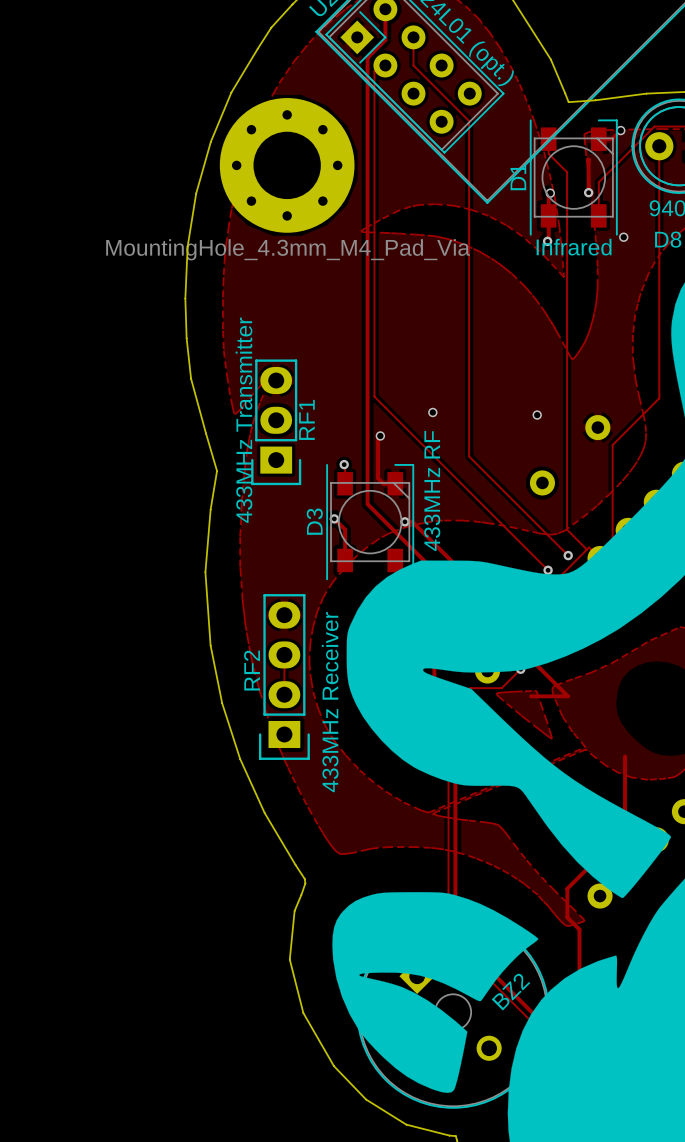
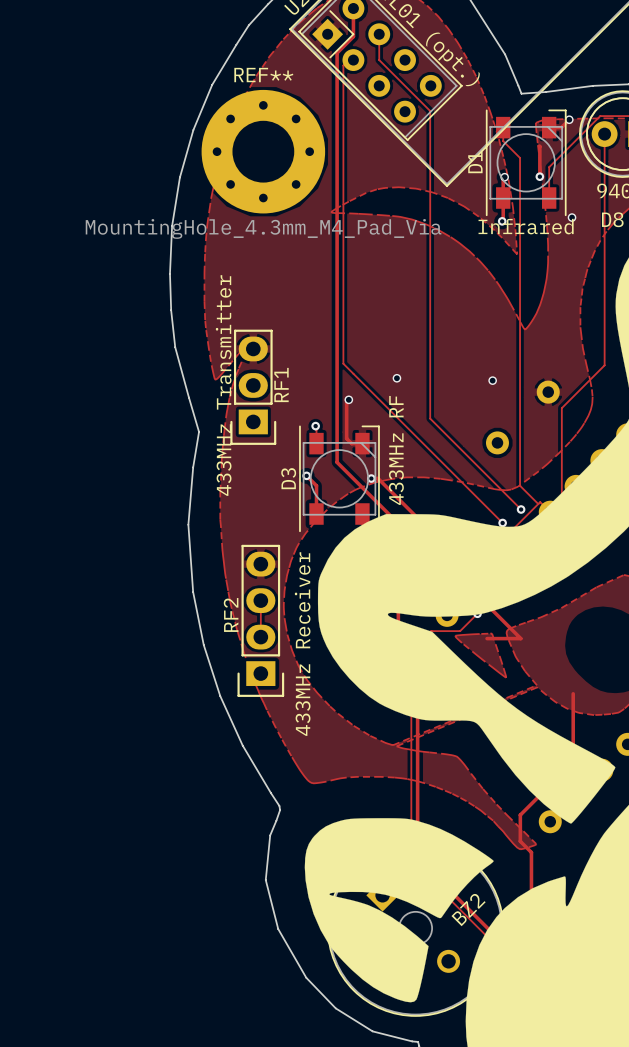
REF** name: none -> REF** (263, 75)

